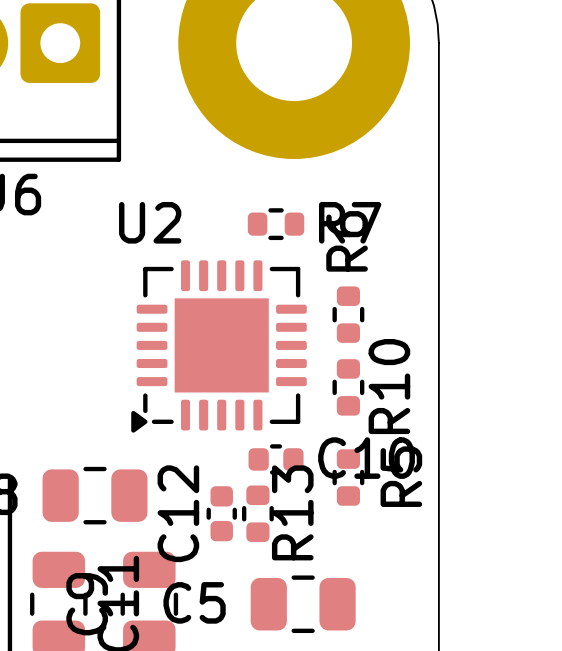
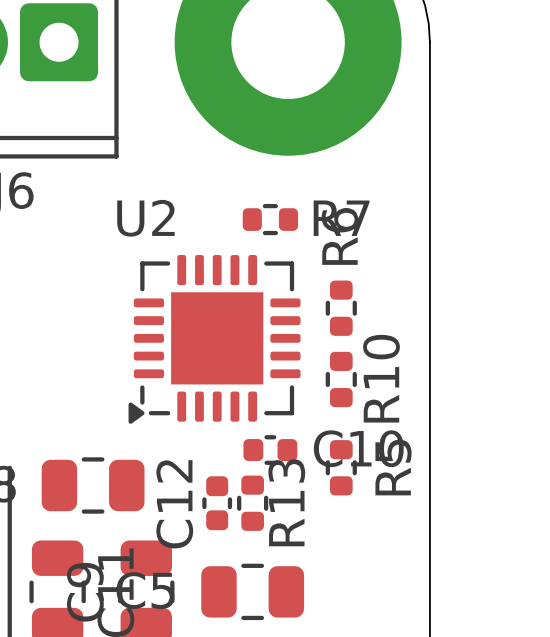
C5 position: (303, 604) -> (252, 591)

